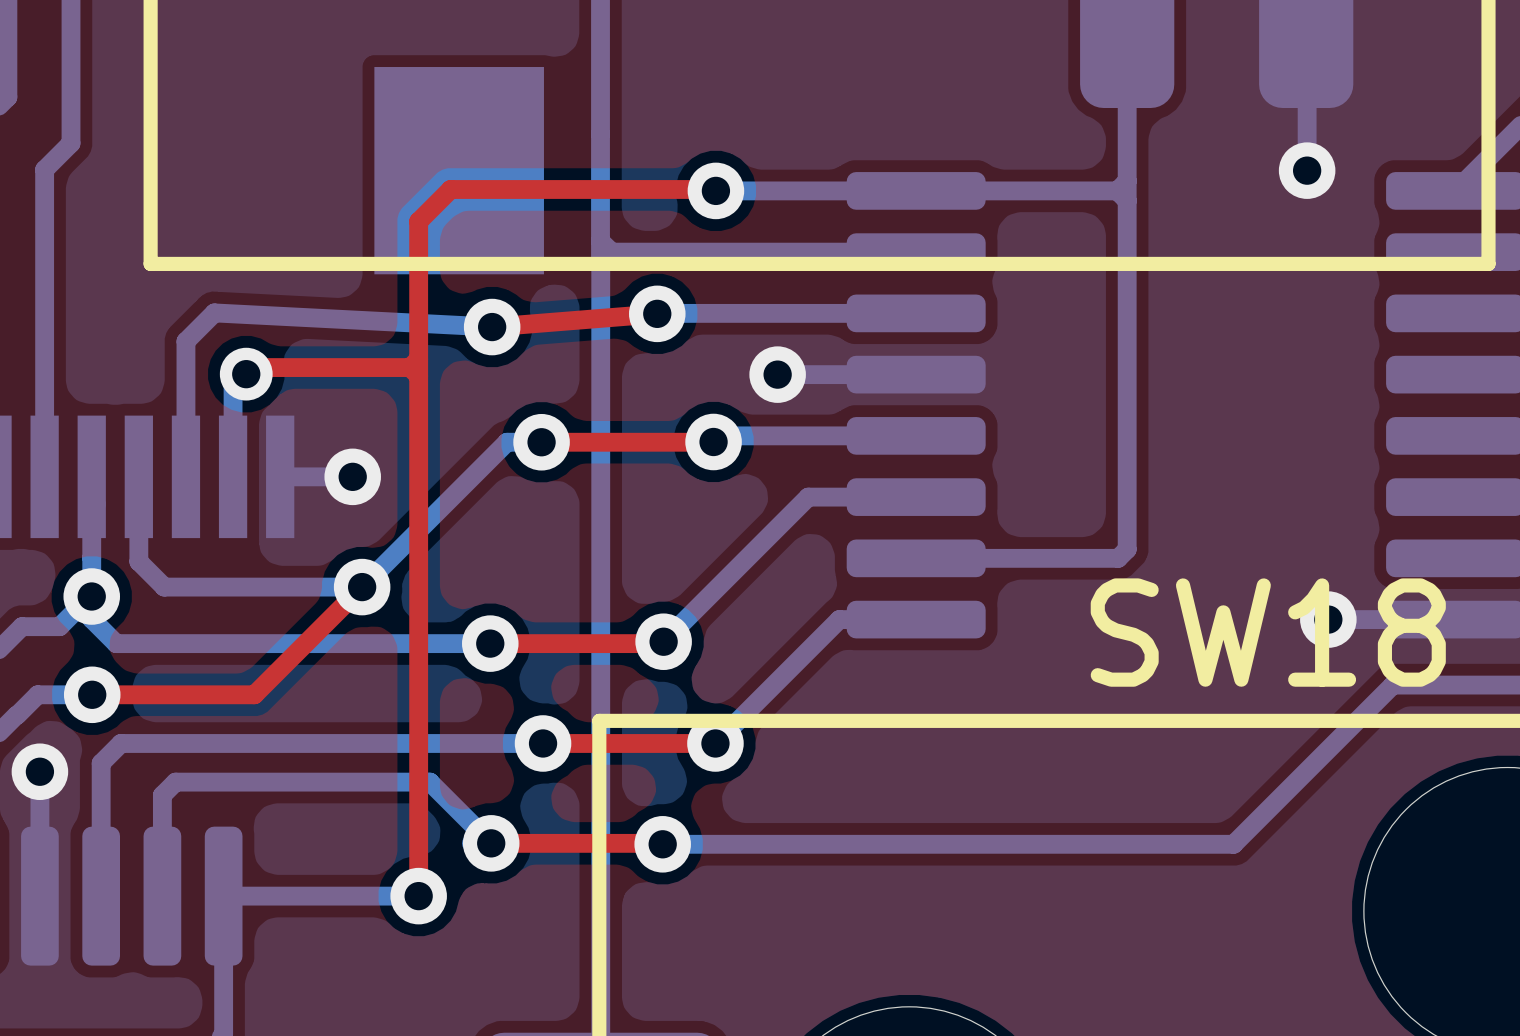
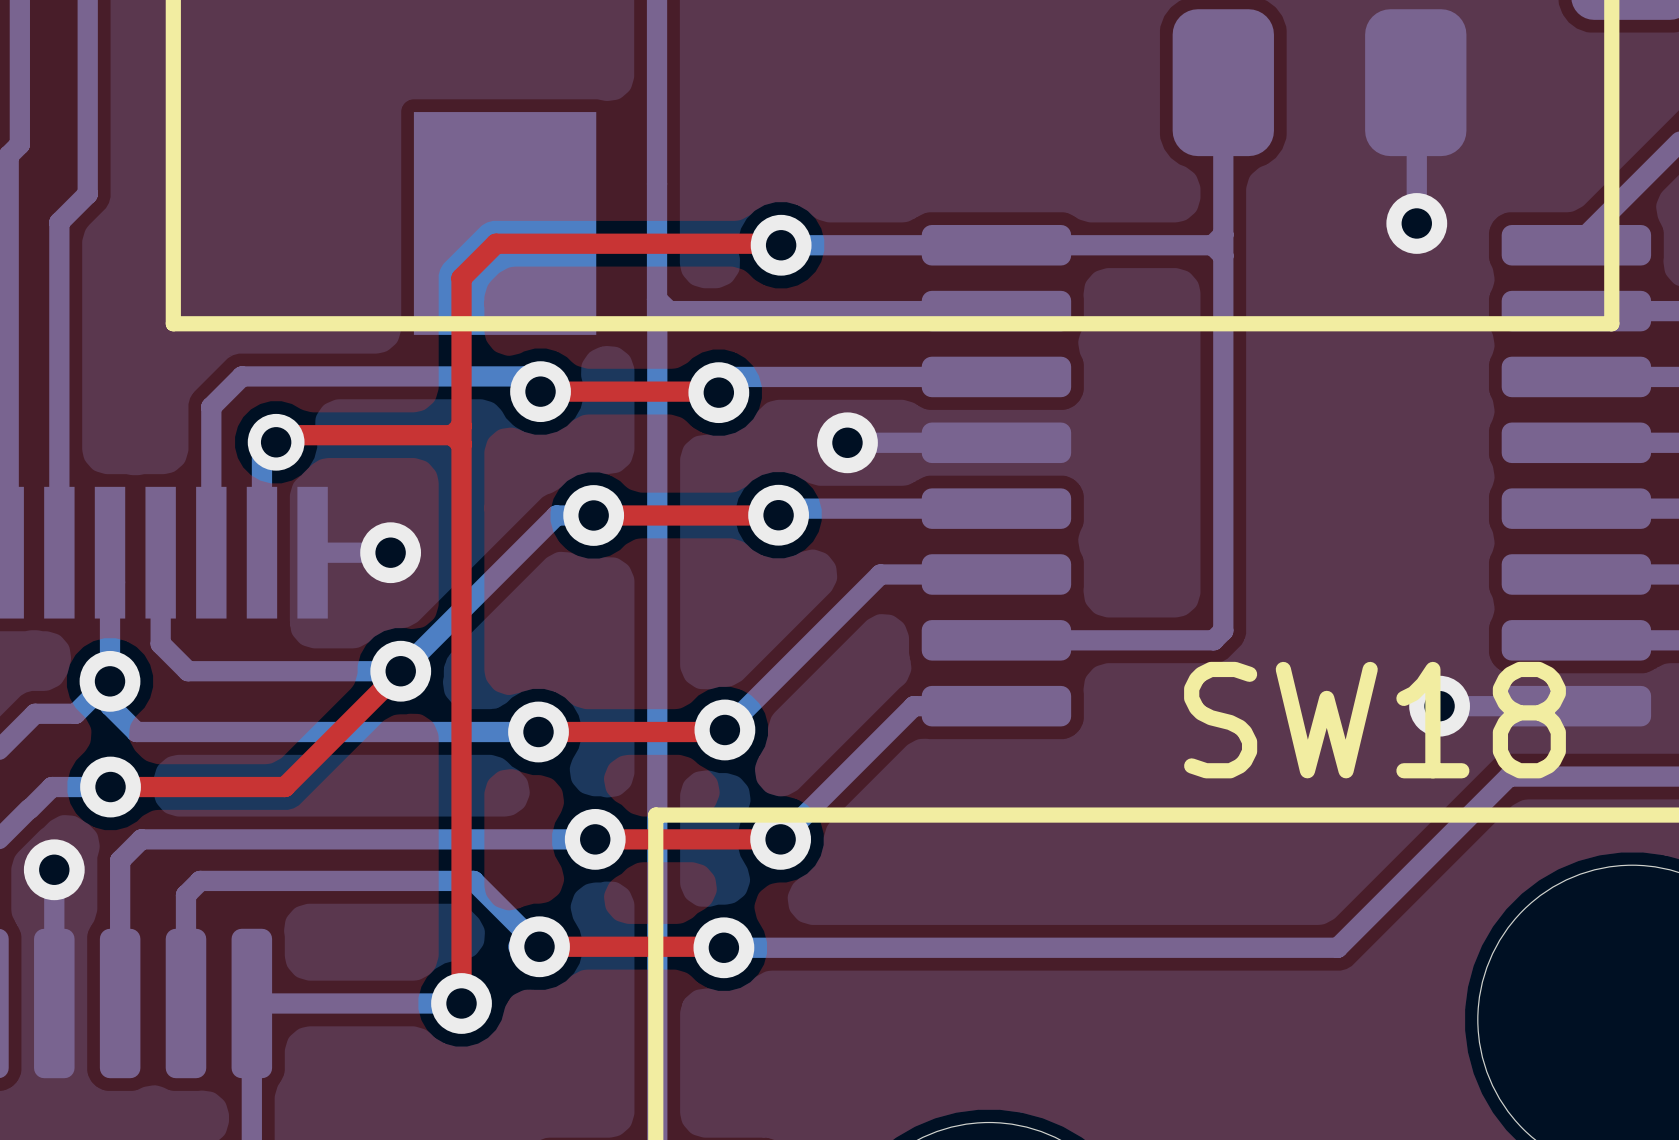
bottom track: (214, 312) (492, 327) -> (241, 376) (525, 376) (540, 391)
top track: (657, 313) (492, 327) -> (717, 391) (540, 391)
via position: (657, 313) -> (718, 392)

